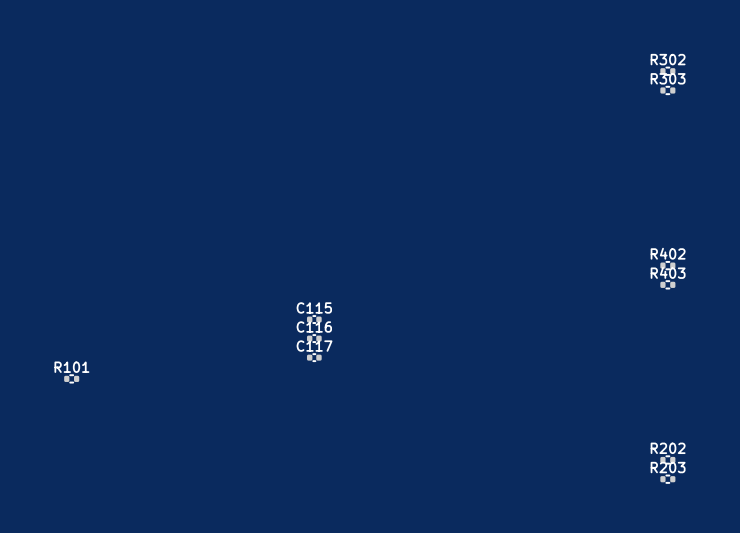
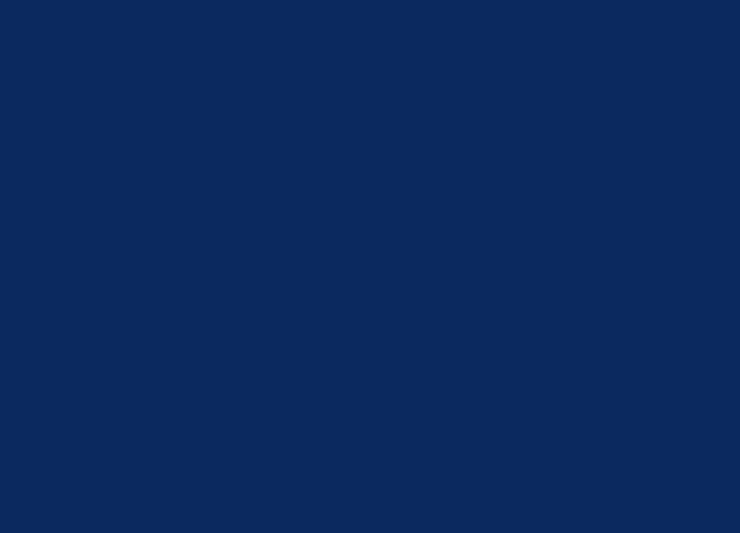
R302: (667, 71) -> none
R303: (667, 90) -> none
R402: (667, 265) -> none
R403: (667, 284) -> none
C115: (314, 319) -> none
C116: (314, 338) -> none
C117: (314, 357) -> none
R101: (71, 378) -> none
R202: (667, 459) -> none
R203: (667, 479) -> none

